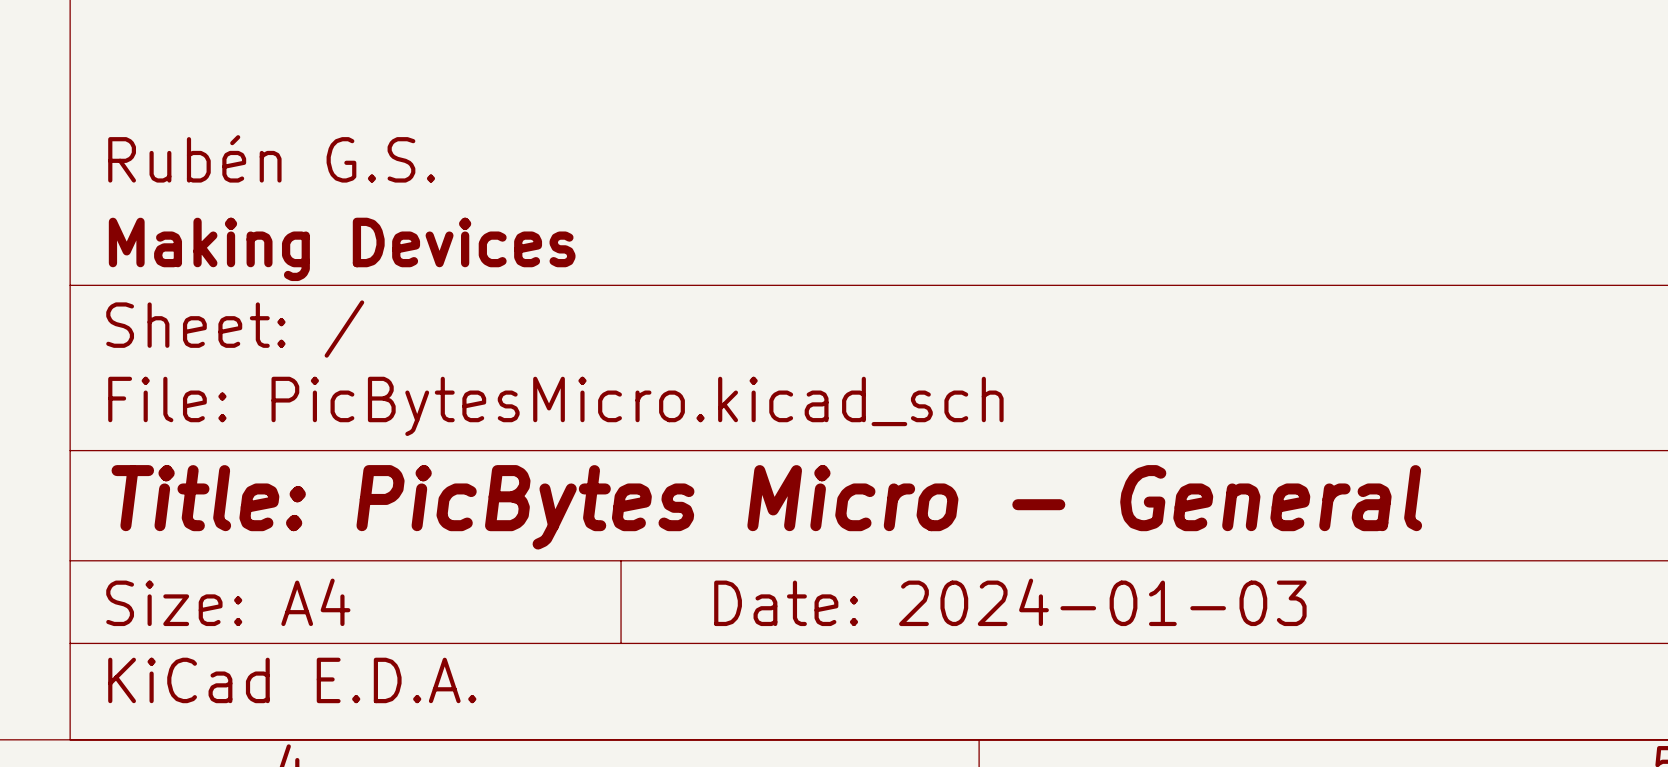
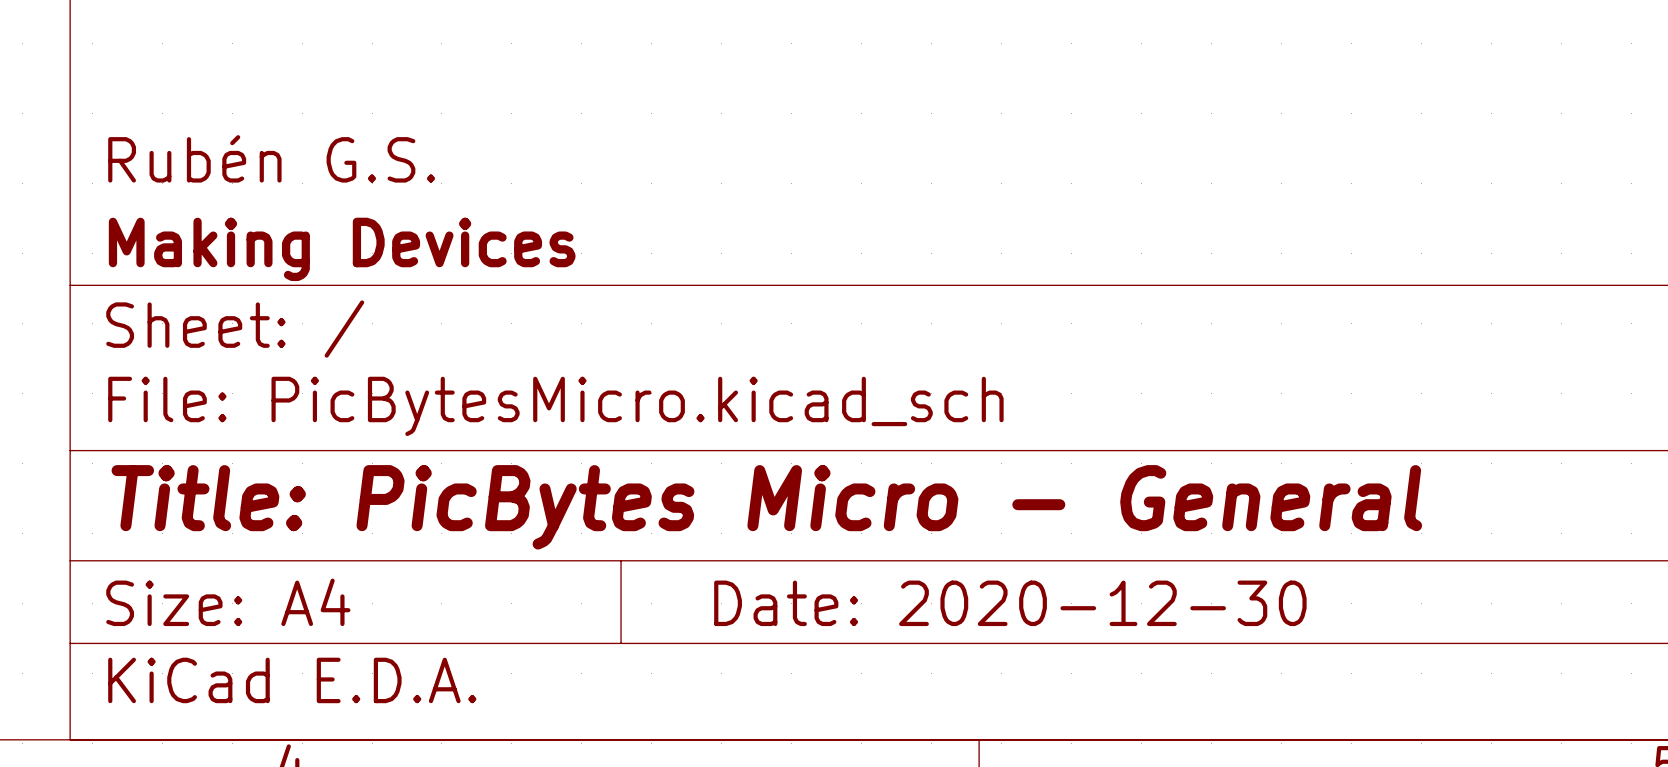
title block: Date: 2024-01-03 (1010, 602) -> Date: 2020-12-30 (1010, 603)

